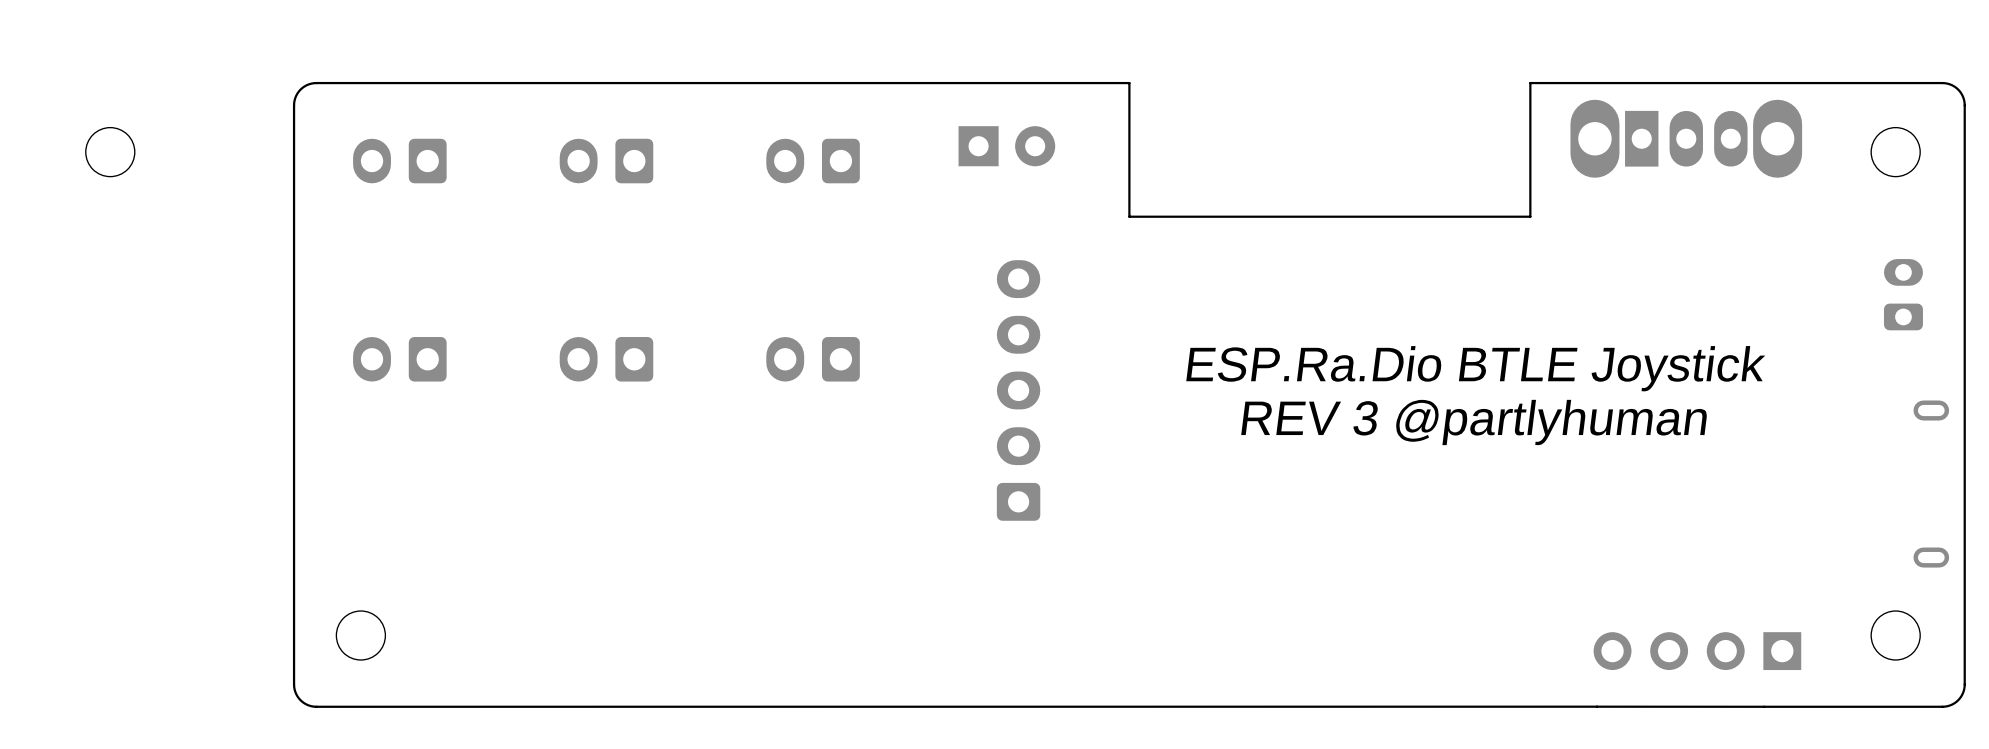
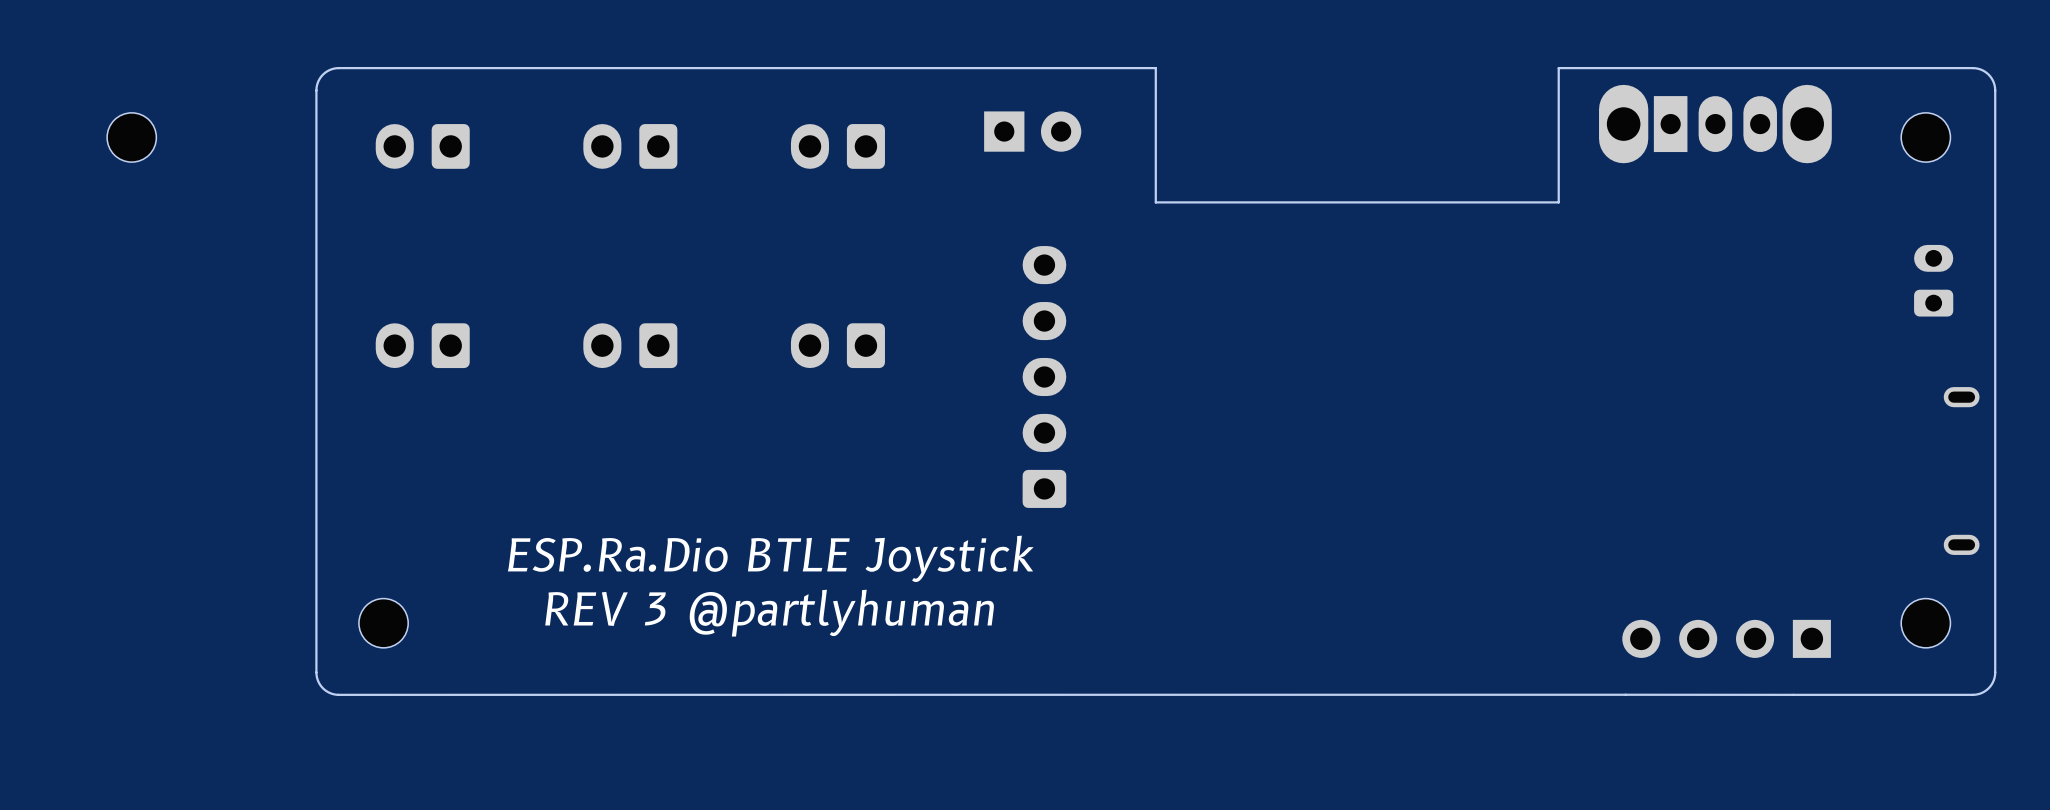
text: ESP.Ra.Dio BTLE Joystick (1475, 368) -> none
text: REV 3 @partlyhuman (1474, 422) -> none
text: none -> ESP.Ra.Dio BTLE Joystick (770, 558)
text: none -> REV 3 @partlyhuman (769, 613)

